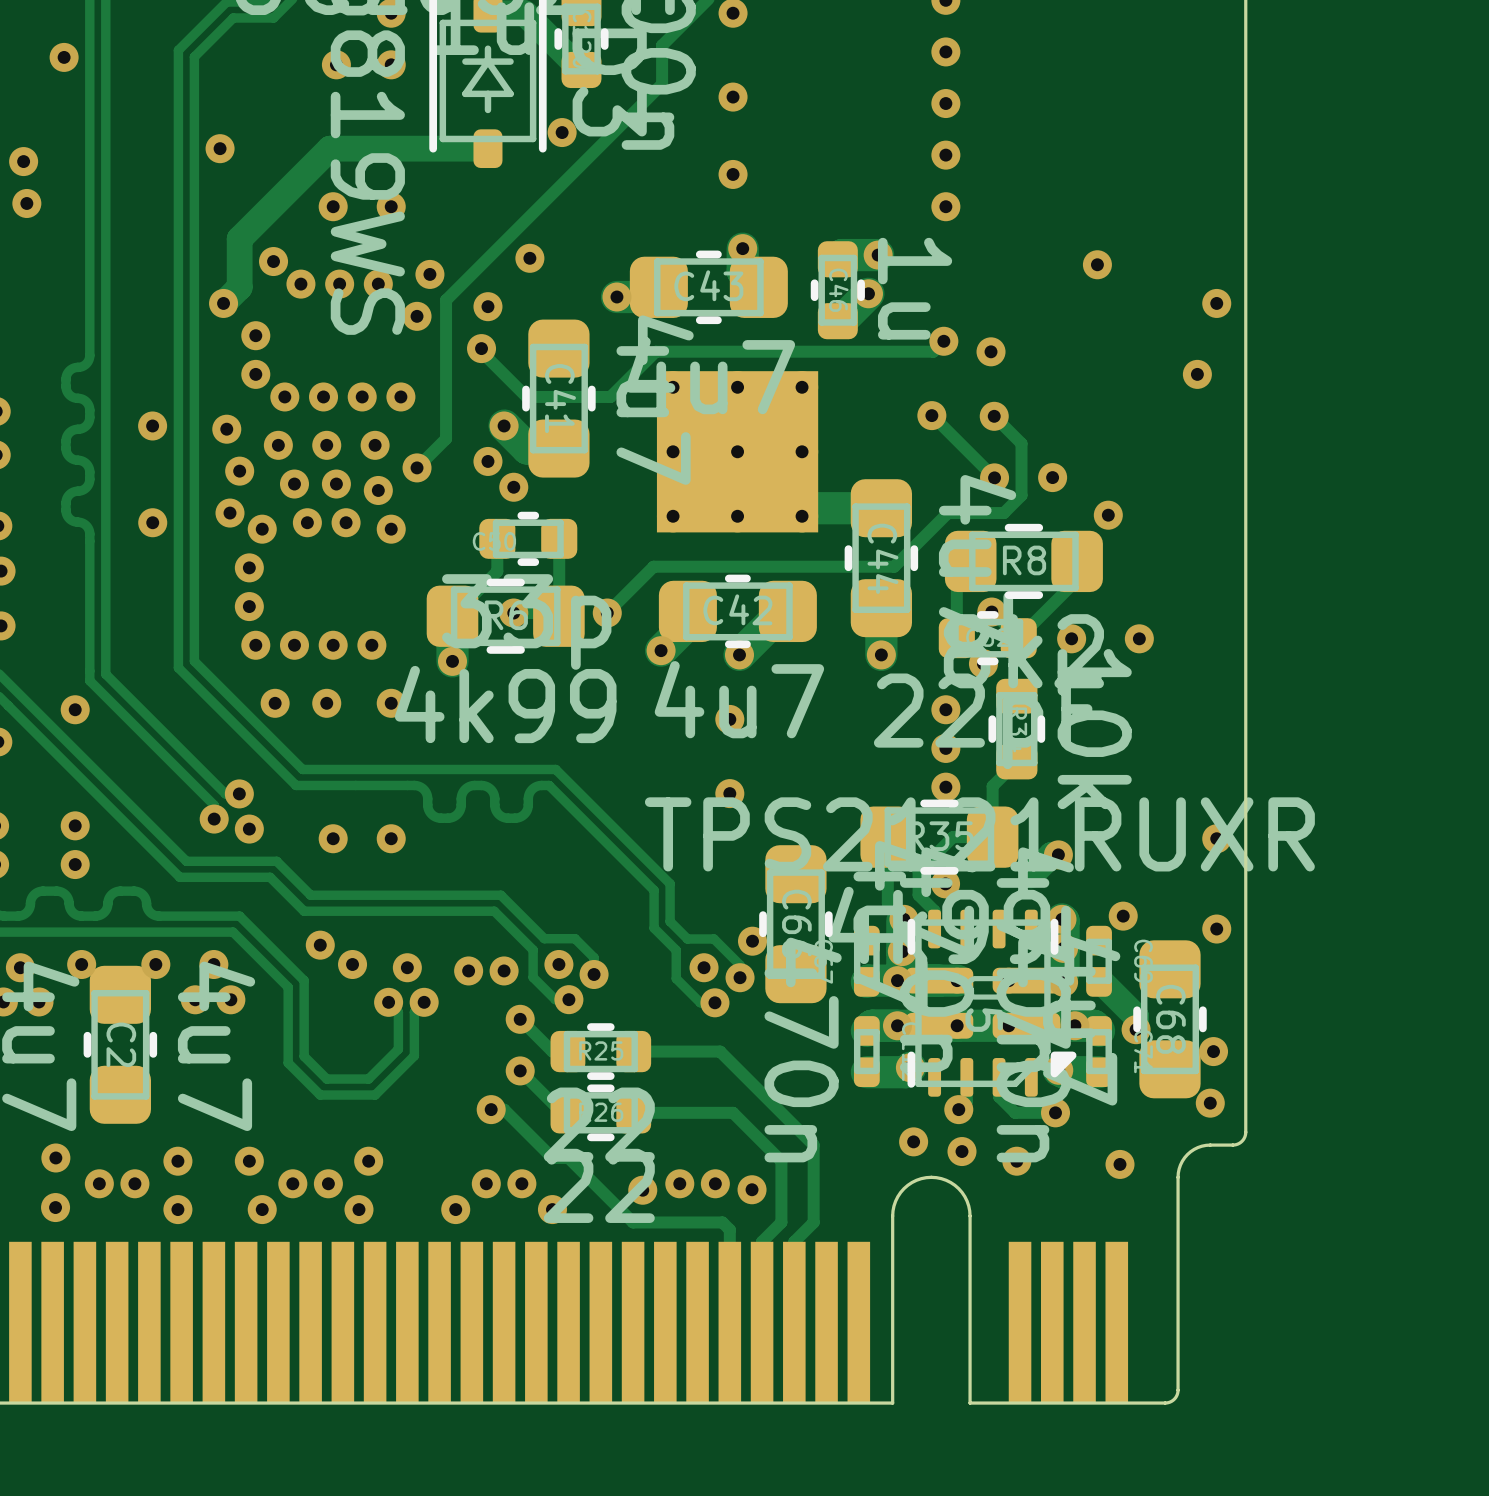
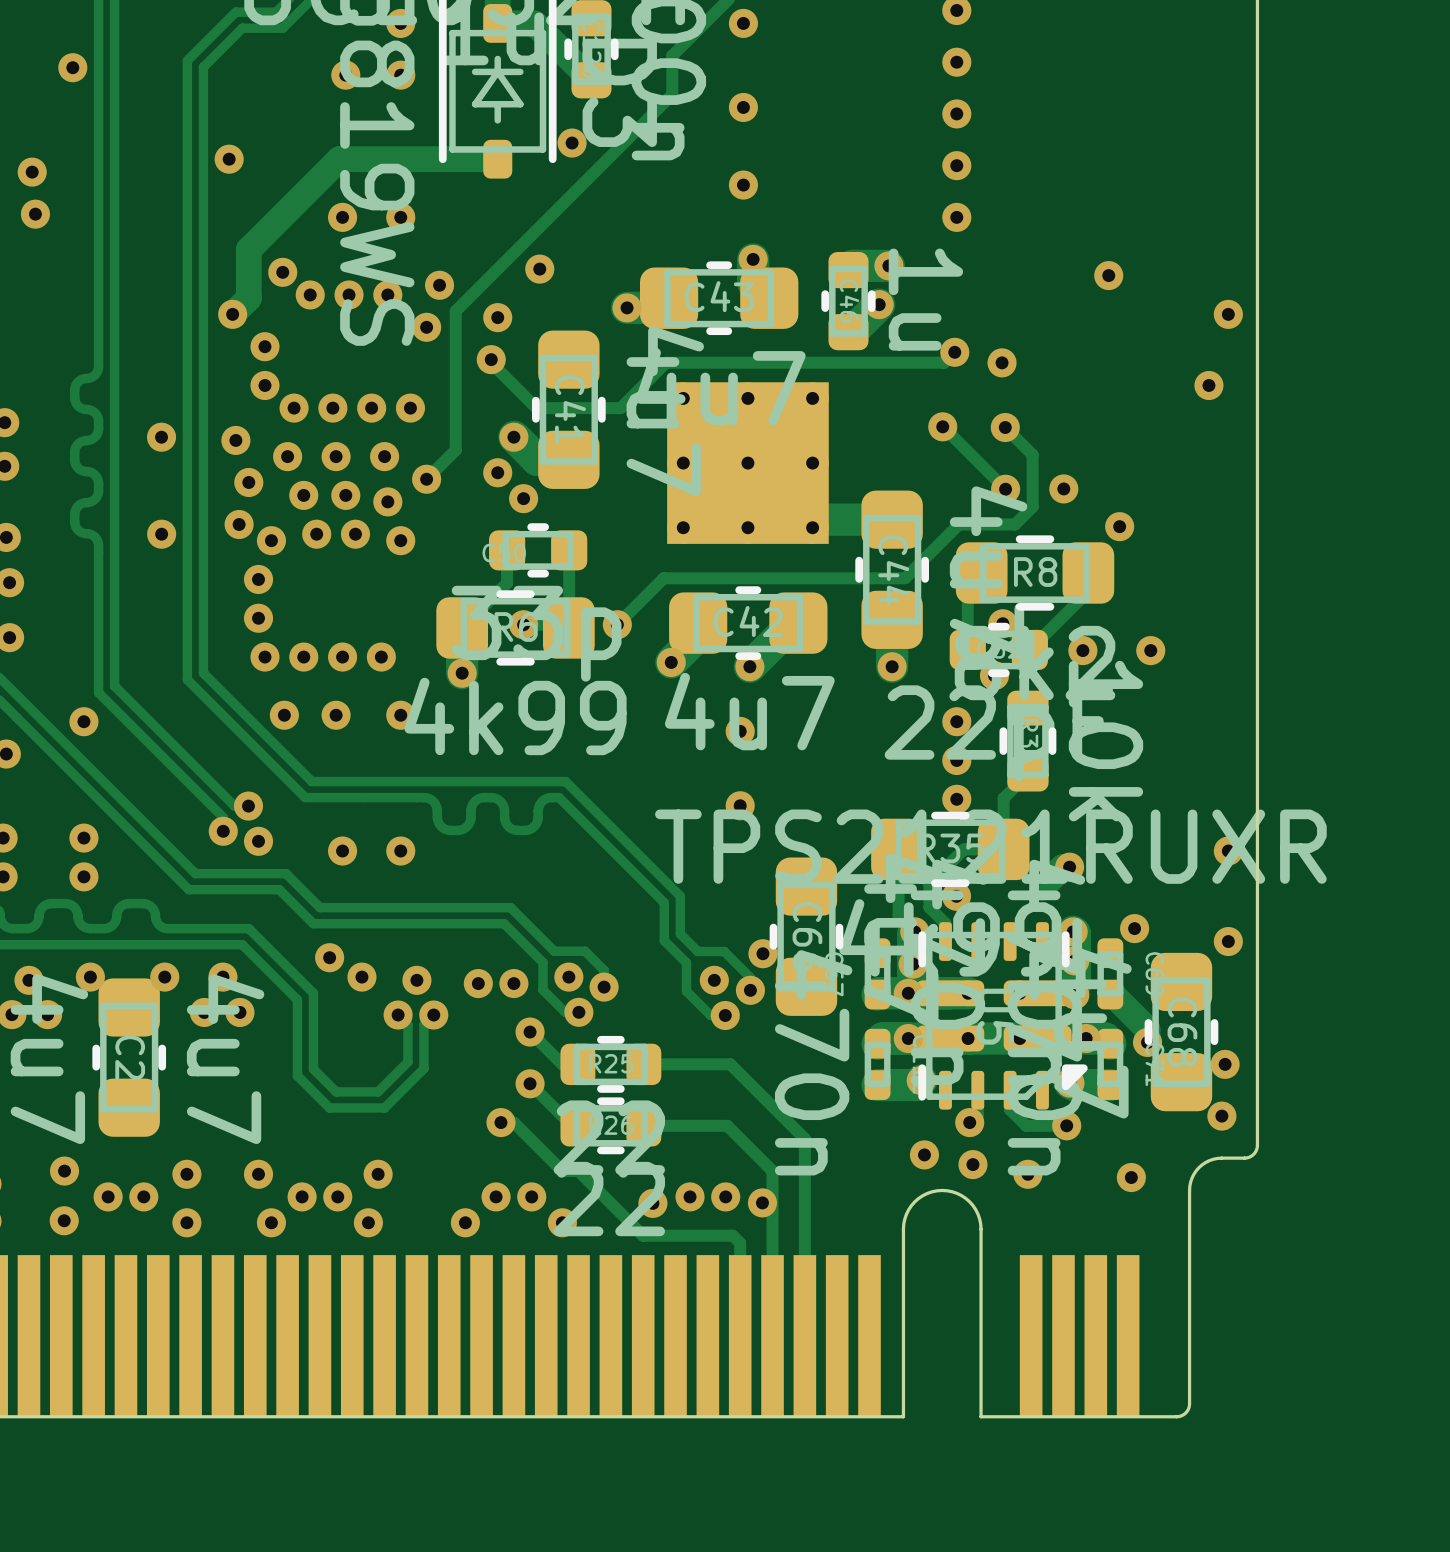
track: (716, 1112) (733, 1112) (781, 1161) (781, 1222) (762, 1241) -> (727, 1125) (772, 1171) (772, 1255)
track: (794, 1125) (813, 1145) (813, 1222) (794, 1241) -> (804, 1138) (804, 1255)

